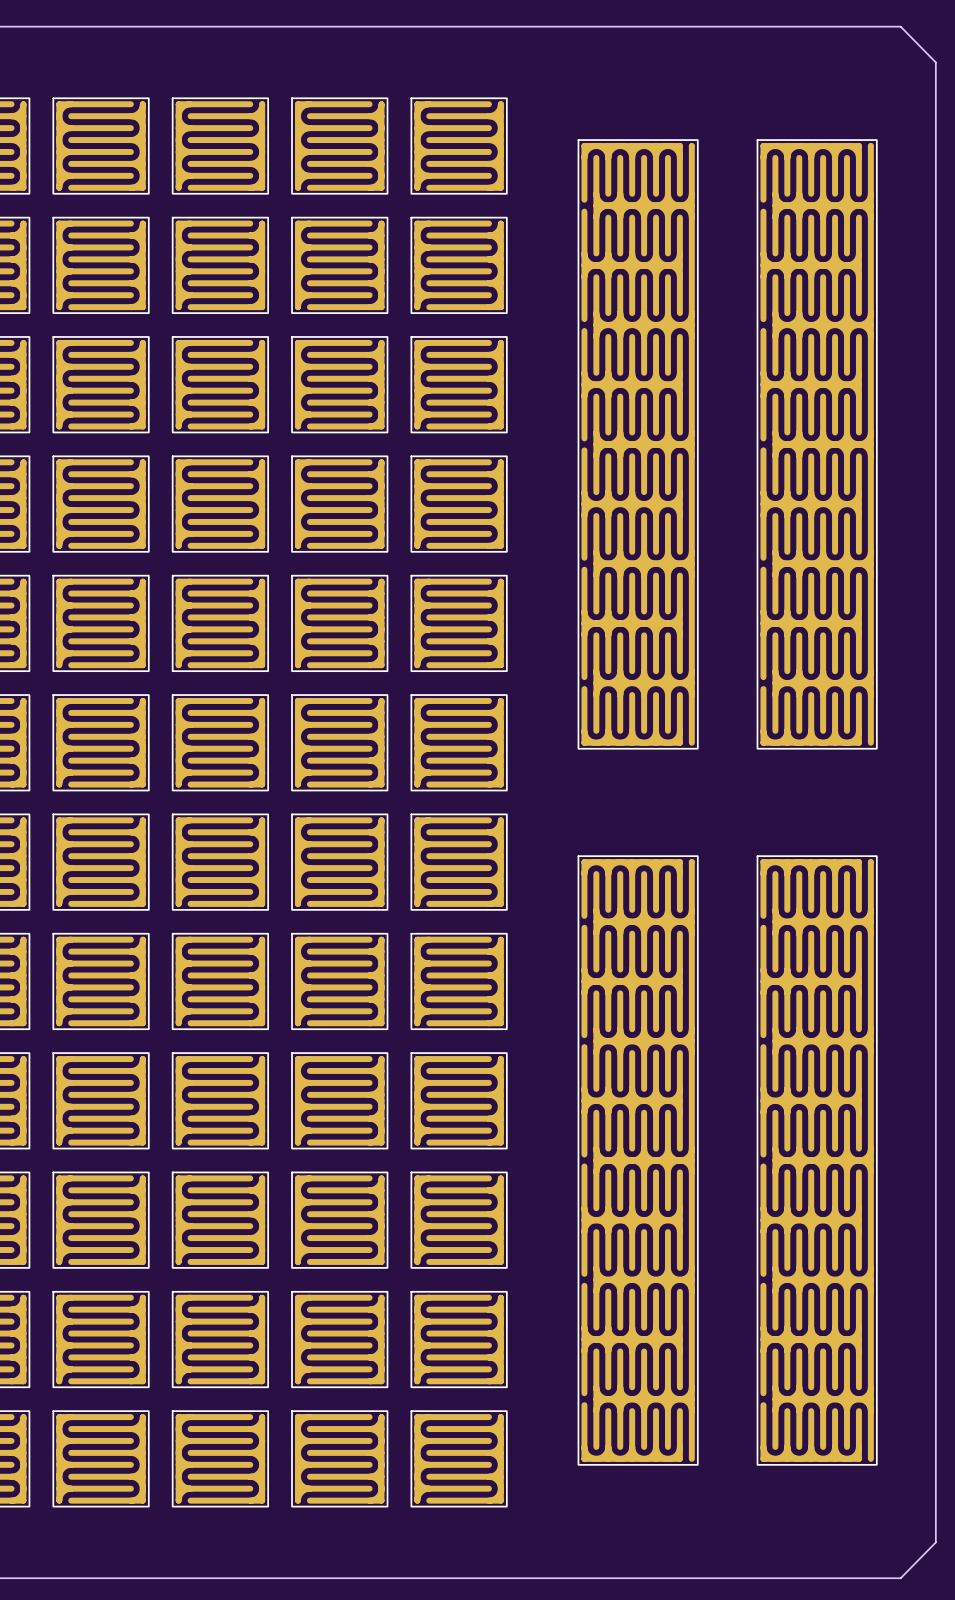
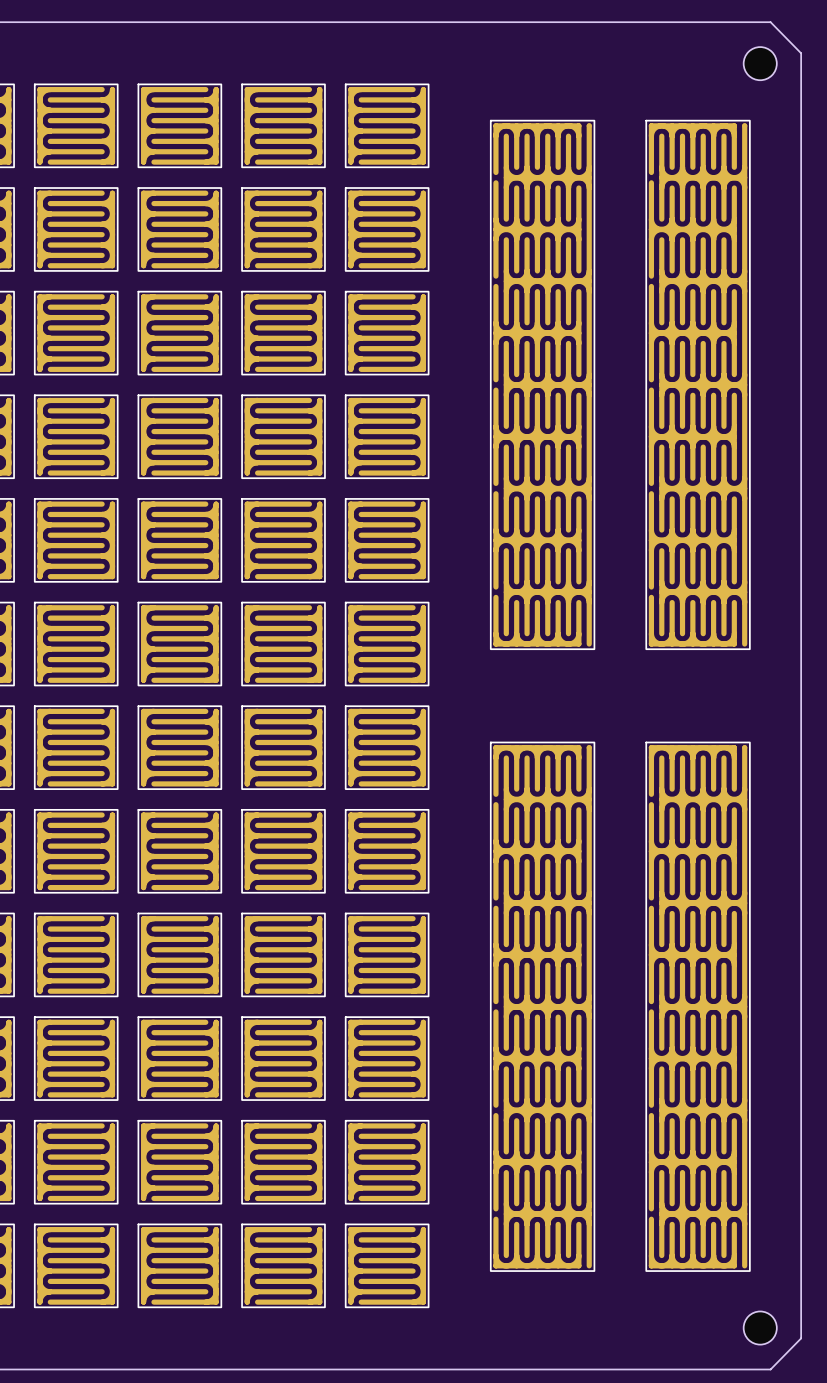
part: none -> (760, 63)
part: none -> (760, 1328)

